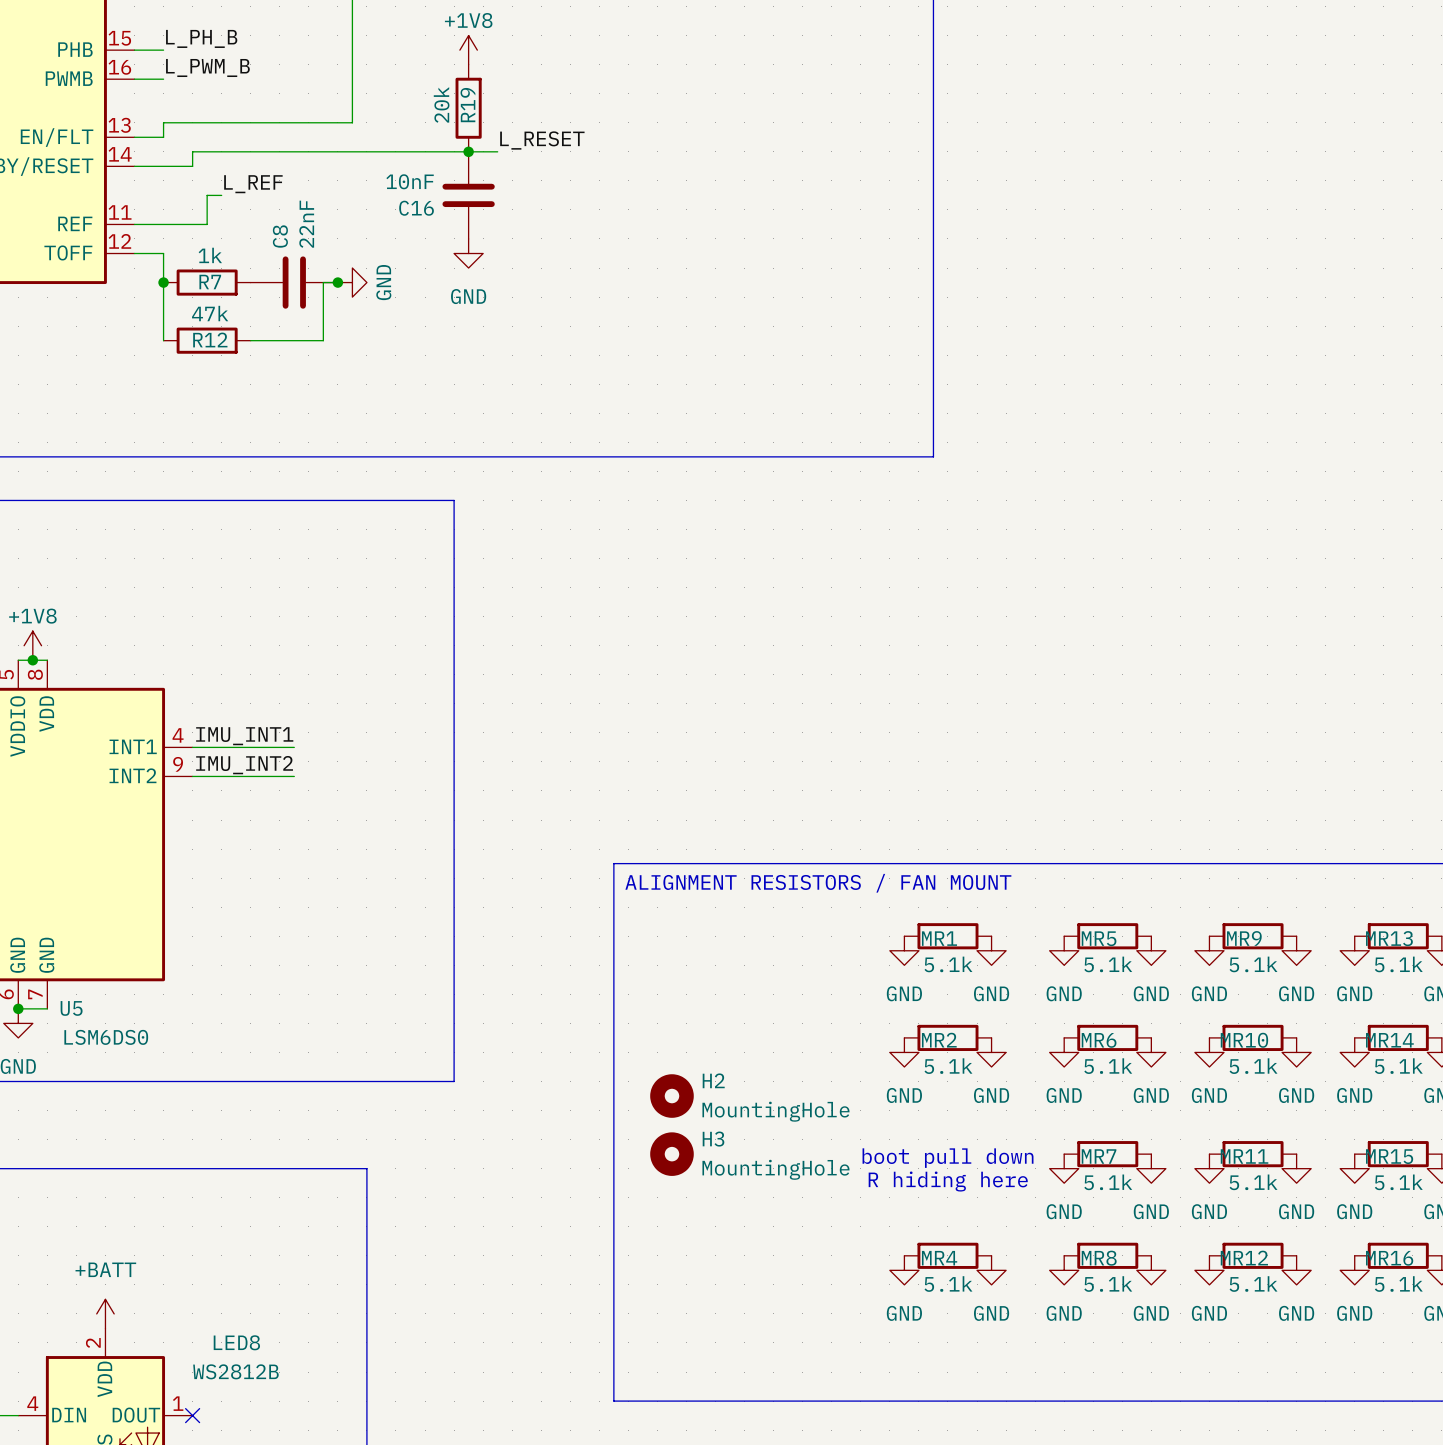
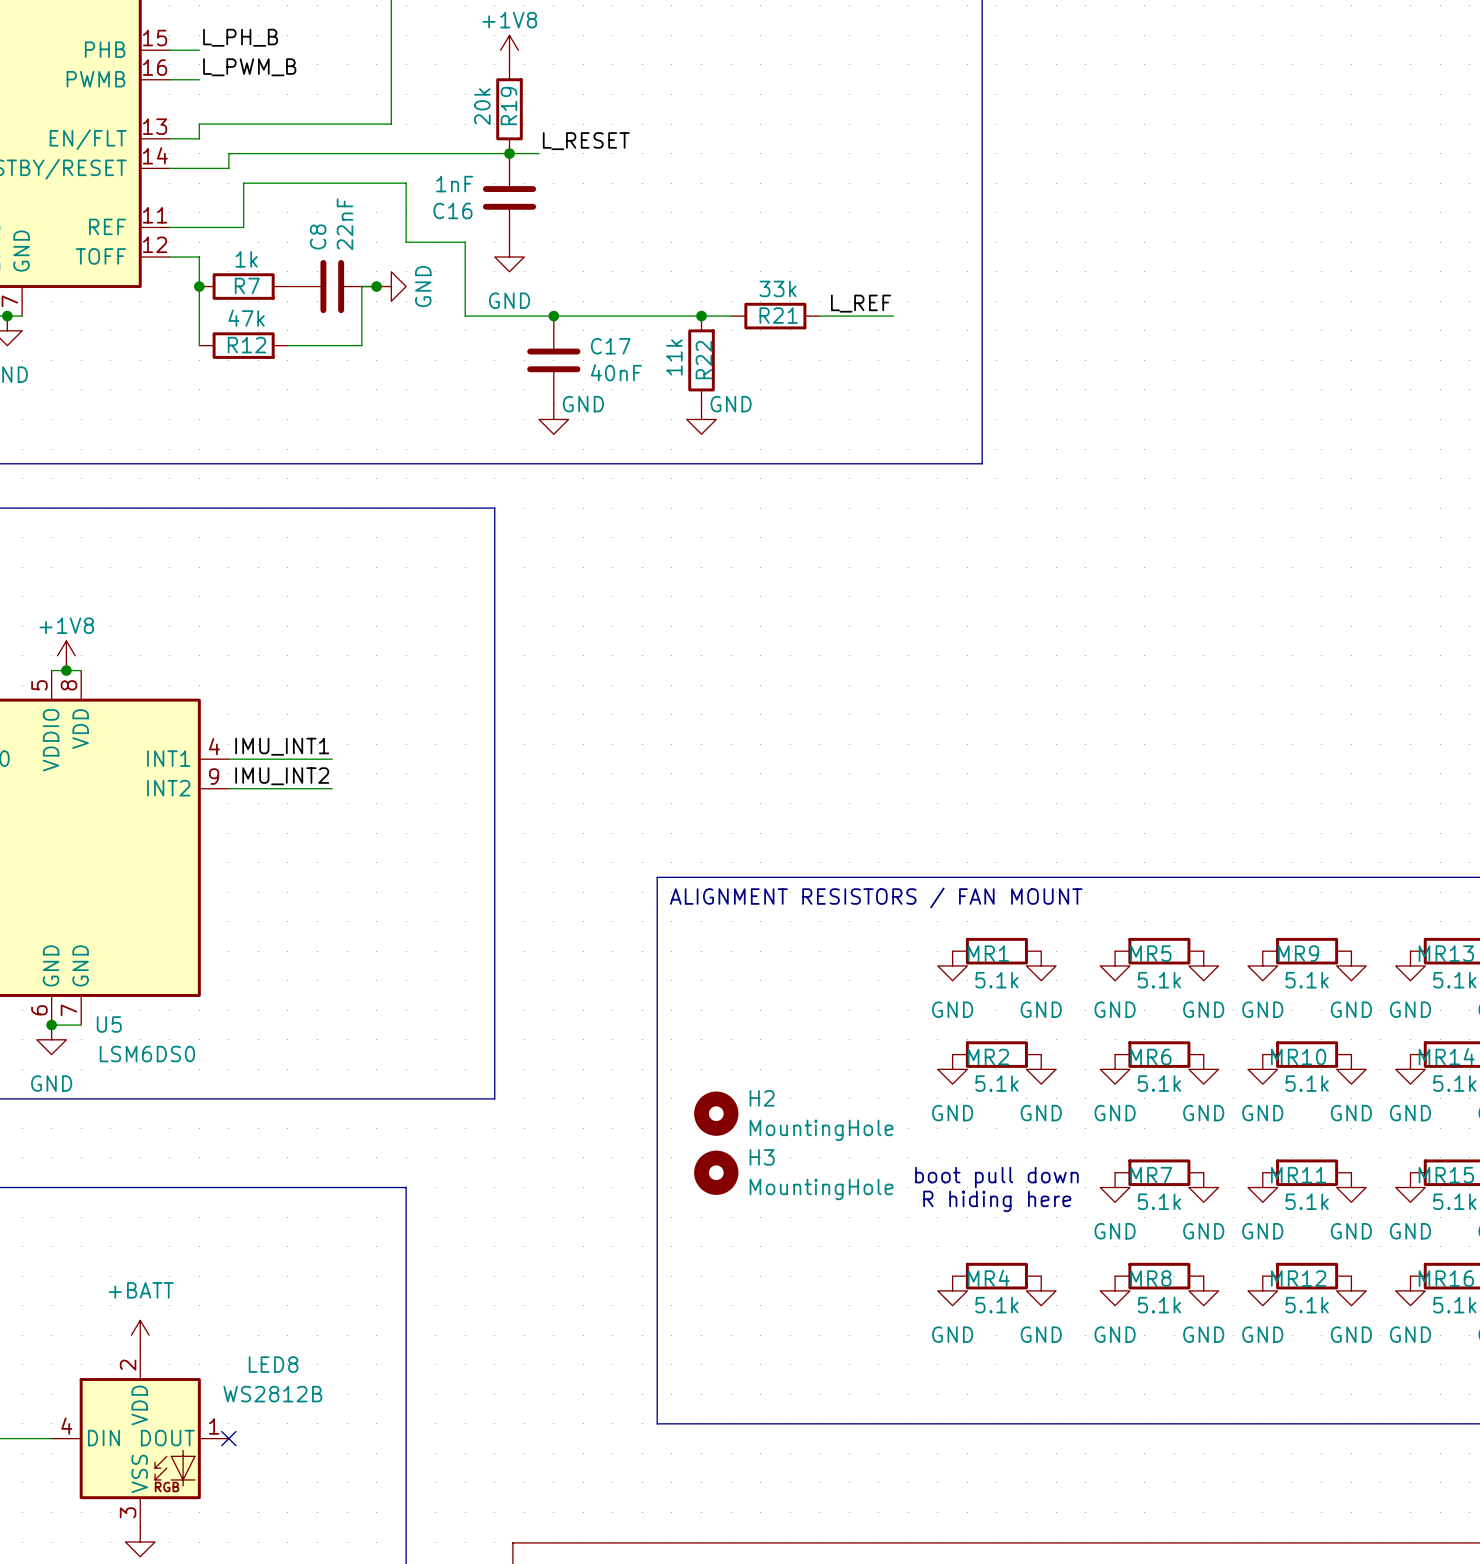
C16 value: 10nF (410, 181) -> 1nF (454, 184)
label: L_REF (253, 184) -> none
wire: (207, 195) (221, 195) -> (243, 197) (243, 183) (406, 183) (406, 242) (465, 242) (465, 316) (731, 316)
label: none -> L_REF (861, 303)
junction: none -> (553, 316)
junction: none -> (701, 316)
R21: none -> 33k (775, 316)
wire: none -> (819, 316) (893, 316)
C17: none -> 40nF (553, 360)
R22: none -> 11k (701, 360)
power symbol: none -> GND (553, 419)
power symbol: none -> GND (701, 419)

